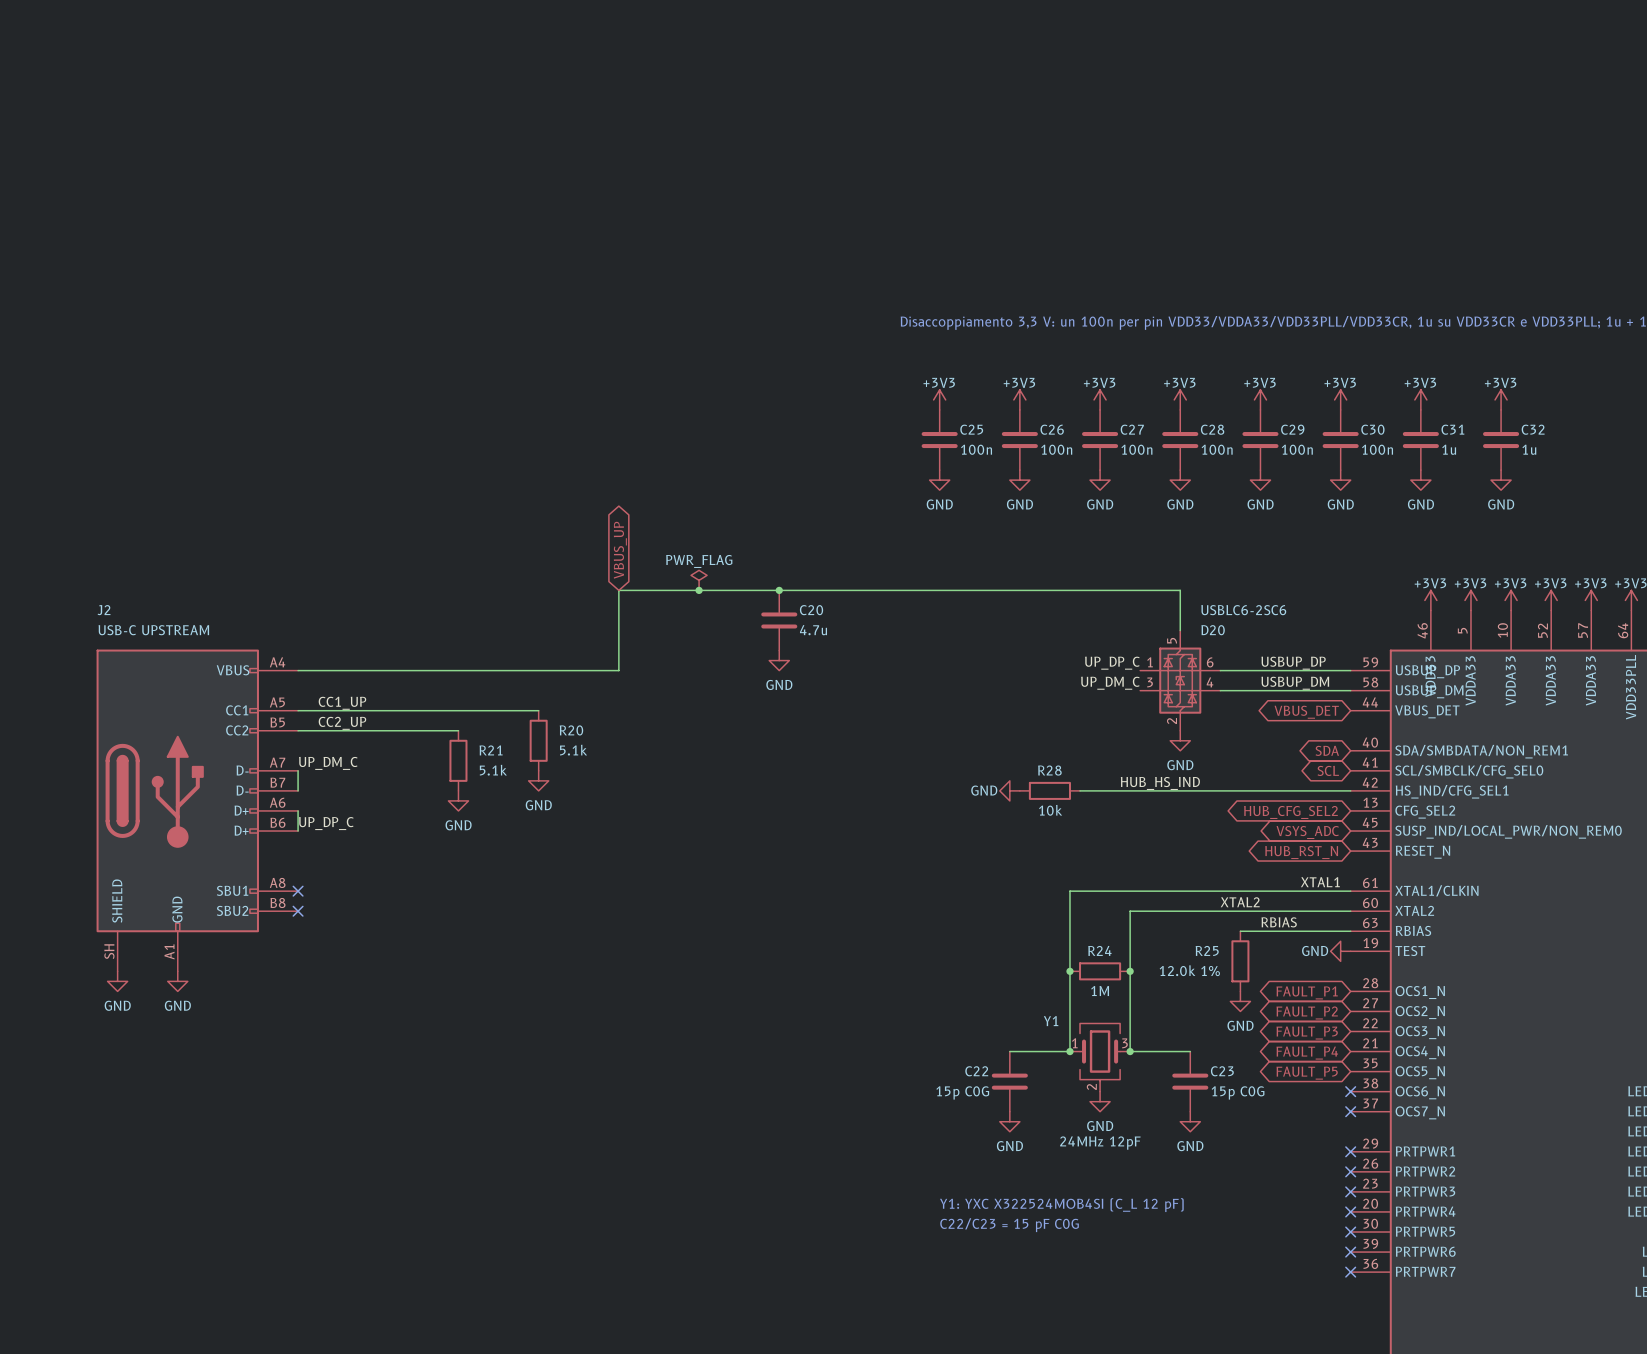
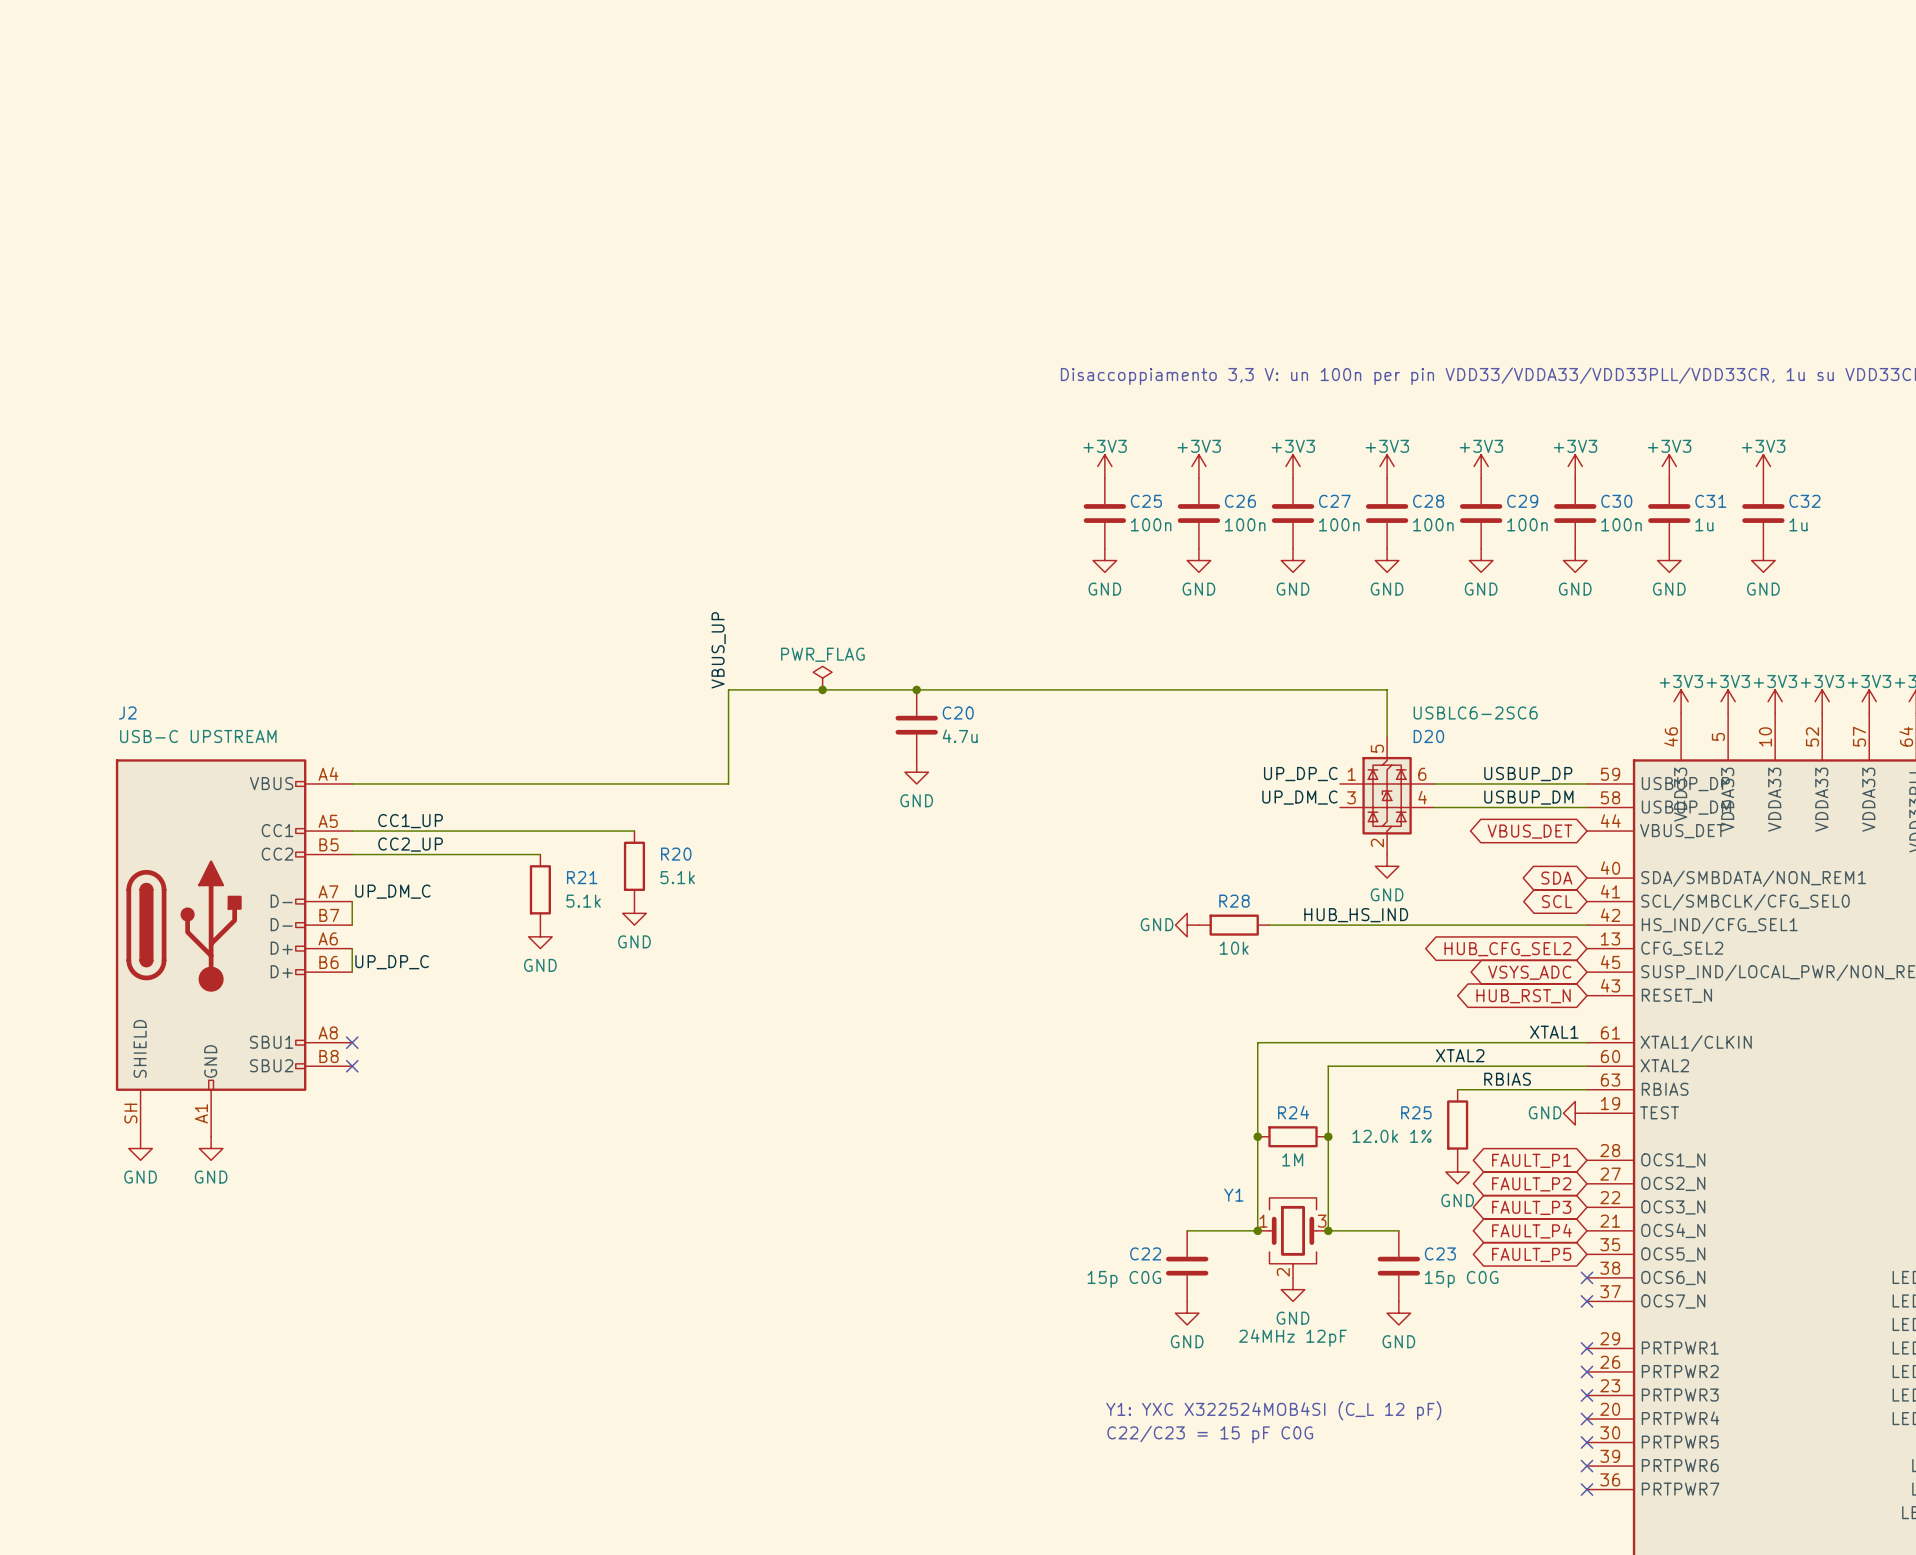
global label: VBUS_UP (620, 550) -> none
label: none -> VBUS_UP (718, 650)

